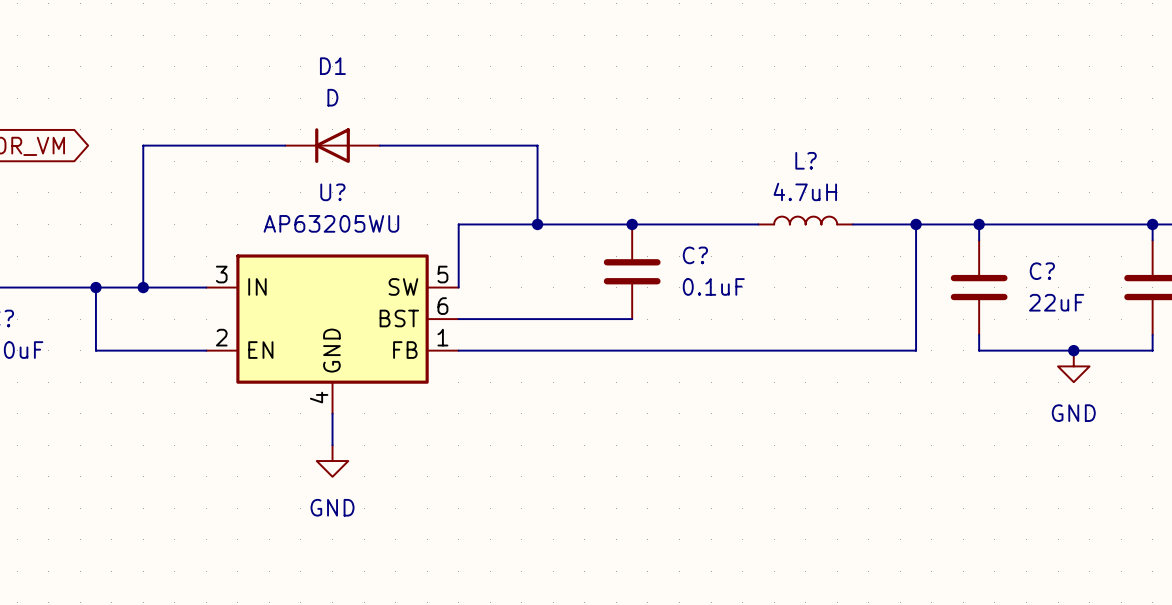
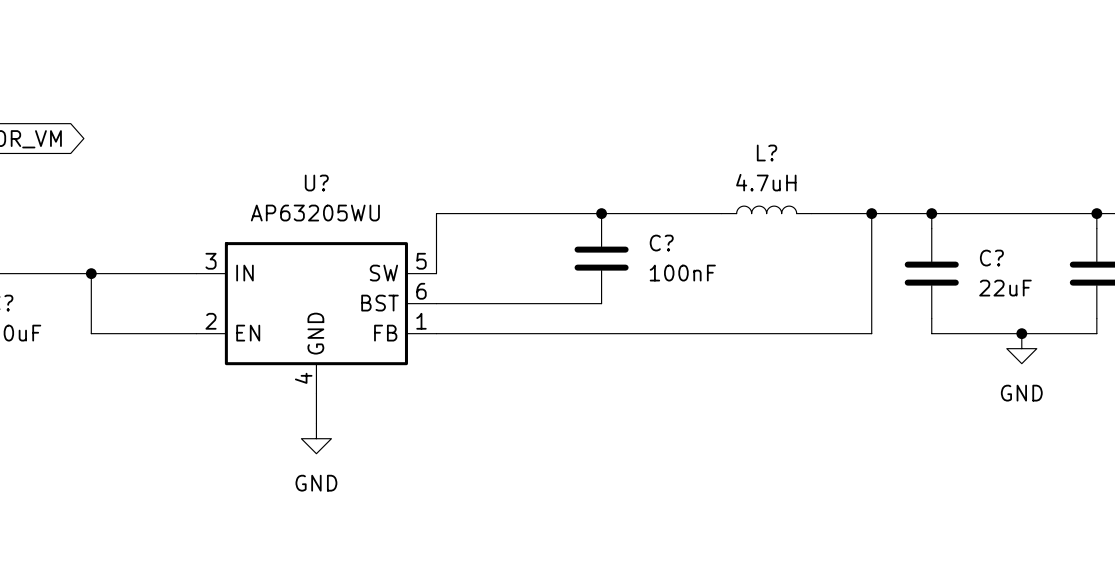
wire: (285, 145) (143, 145) (143, 287) -> none
D1: D (332, 145) -> none
wire: (379, 145) (537, 145) (537, 224) -> none
junction: (537, 224) -> none
C? value: 0.1uF (713, 286) -> 100nF (682, 273)
junction: (143, 287) -> none

